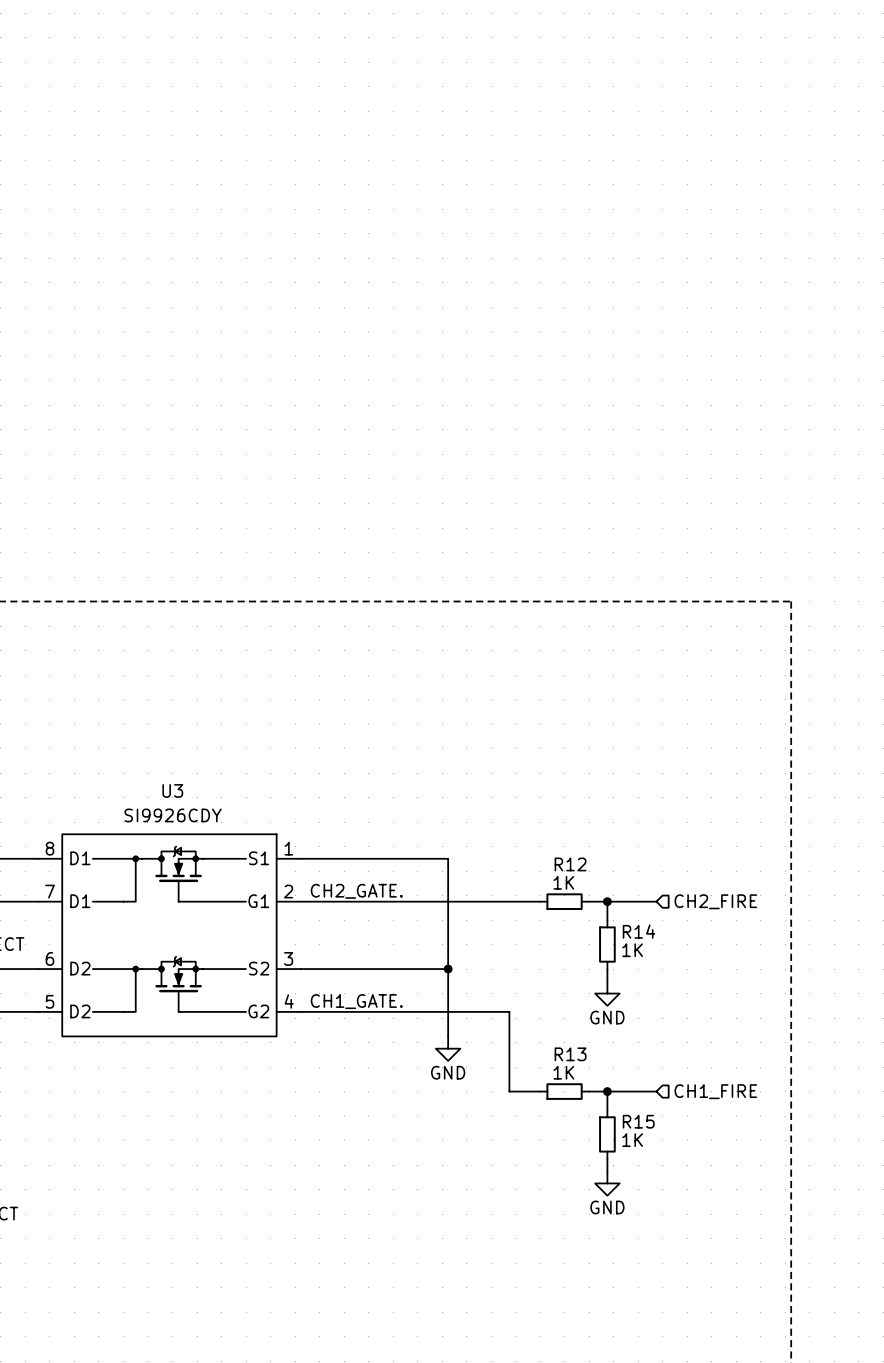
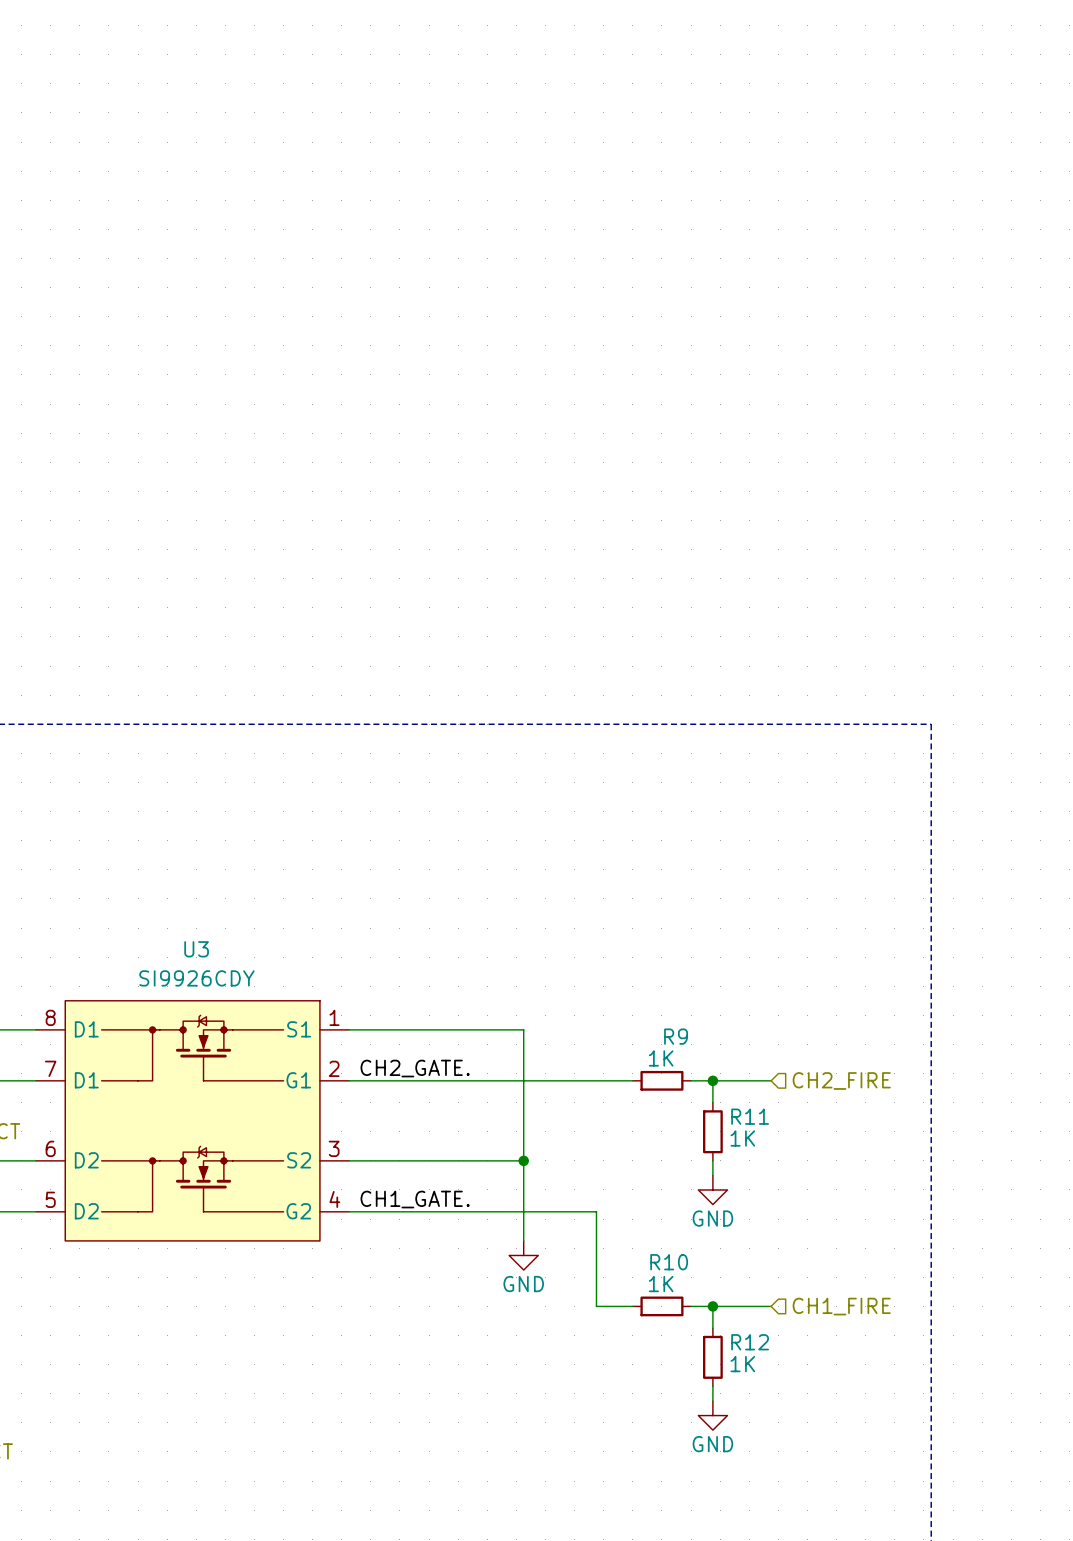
R12 name: R12 (570, 864) -> R9 (676, 1036)
R14 name: R14 (639, 931) -> R11 (750, 1116)
R13 name: R13 (570, 1054) -> R10 (669, 1262)
R15 name: R15 (638, 1121) -> R12 (750, 1342)

